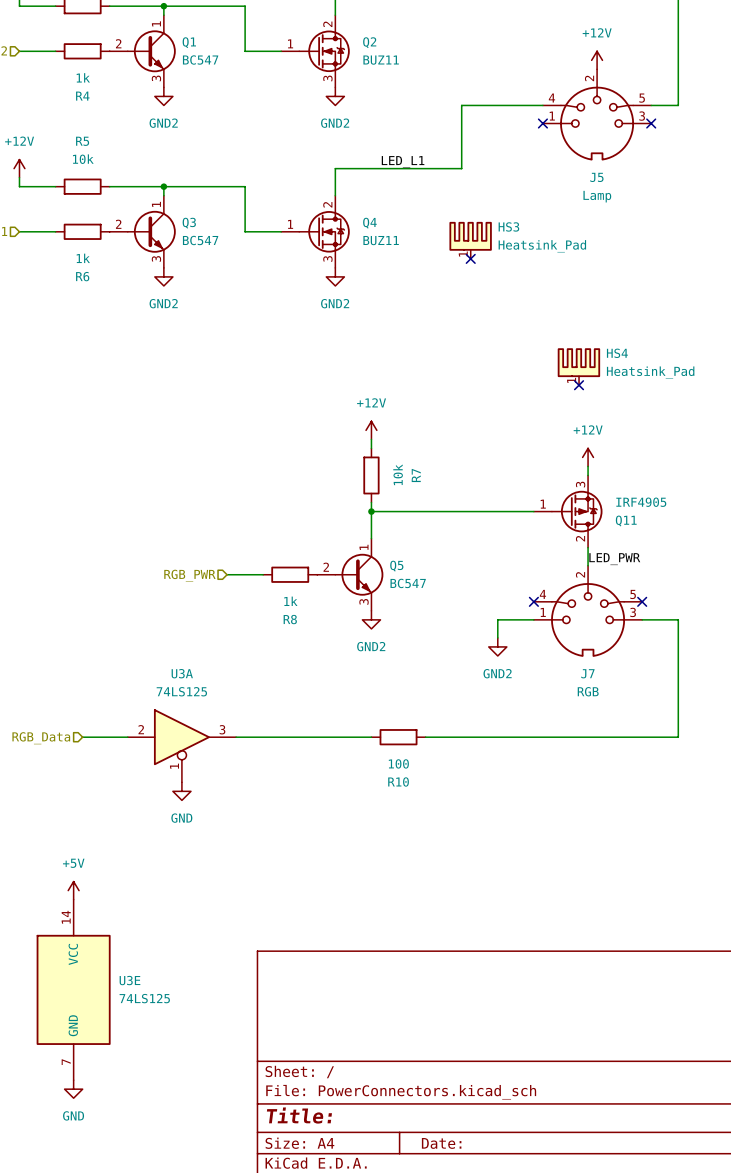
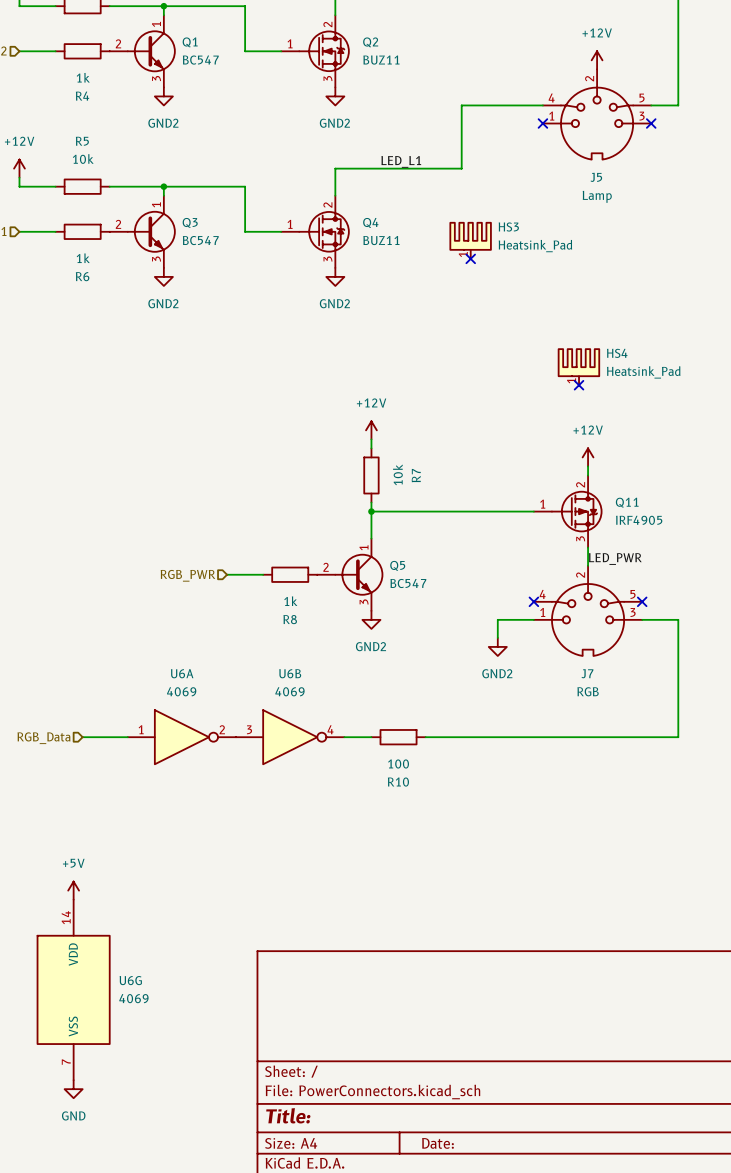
Q11 flip: as is (577, 511) -> up-down (577, 511)
U6A: none -> 4069 (181, 737)
U6B: none -> 4069 (290, 737)
U3A: 74LS125 (181, 745) -> none
power symbol: GND (181, 791) -> none
U3E pin name: VCC (73, 954) -> VDD (73, 954)
U3E name: U3E (129, 980) -> U6G (130, 980)
U3E value: 74LS125 (144, 998) -> 4069 (133, 998)
U3E pin name: GND (73, 1025) -> VSS (73, 1026)

